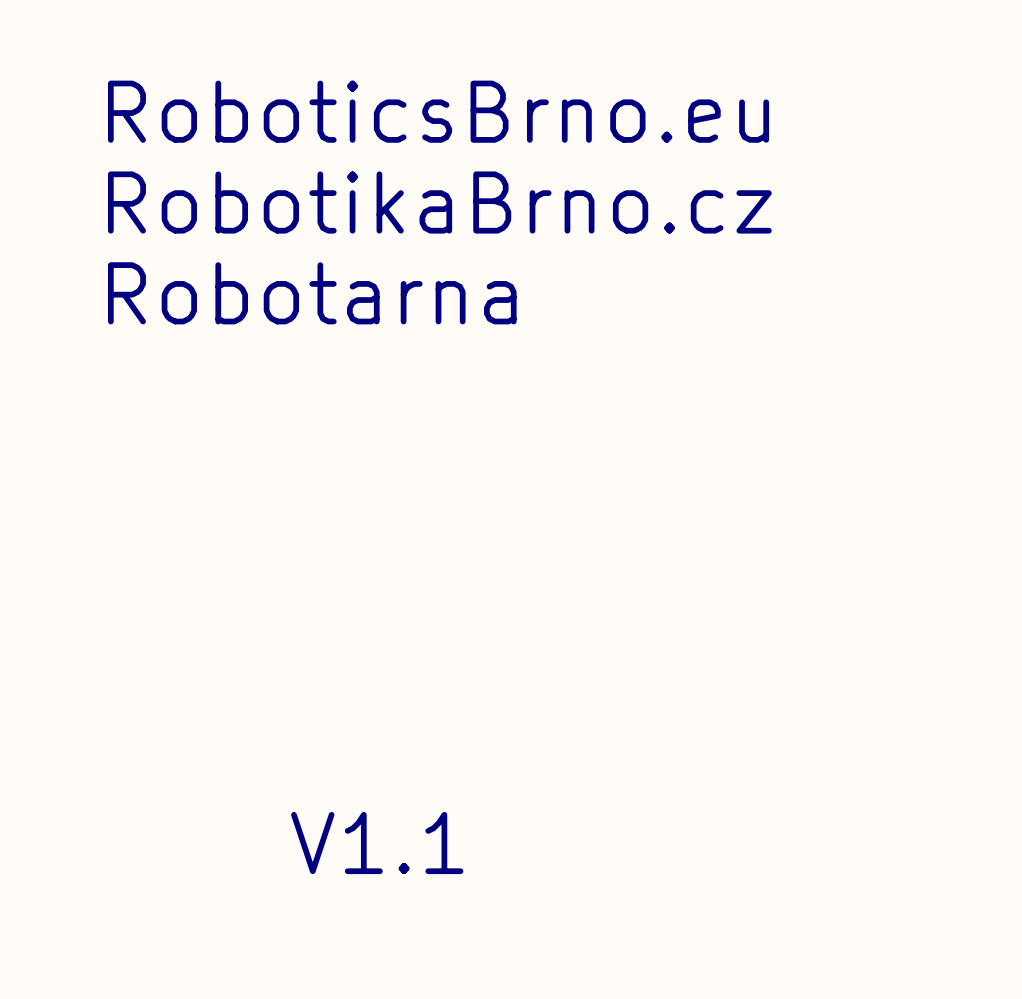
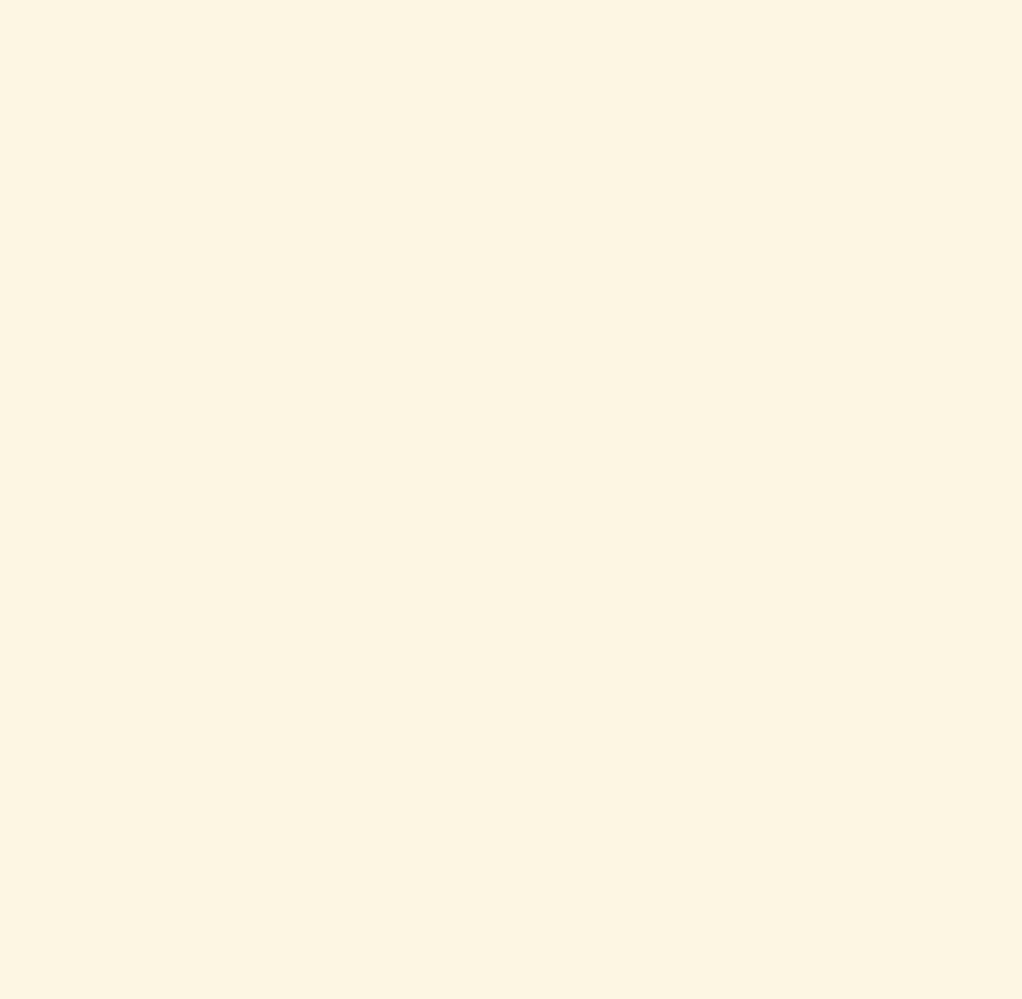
text: RoboticsBrno.eu (438, 111) -> none
text: RobotikaBrno.cz (439, 202) -> none
text: Robotarna (312, 293) -> none
text: V1.1 (377, 843) -> none

